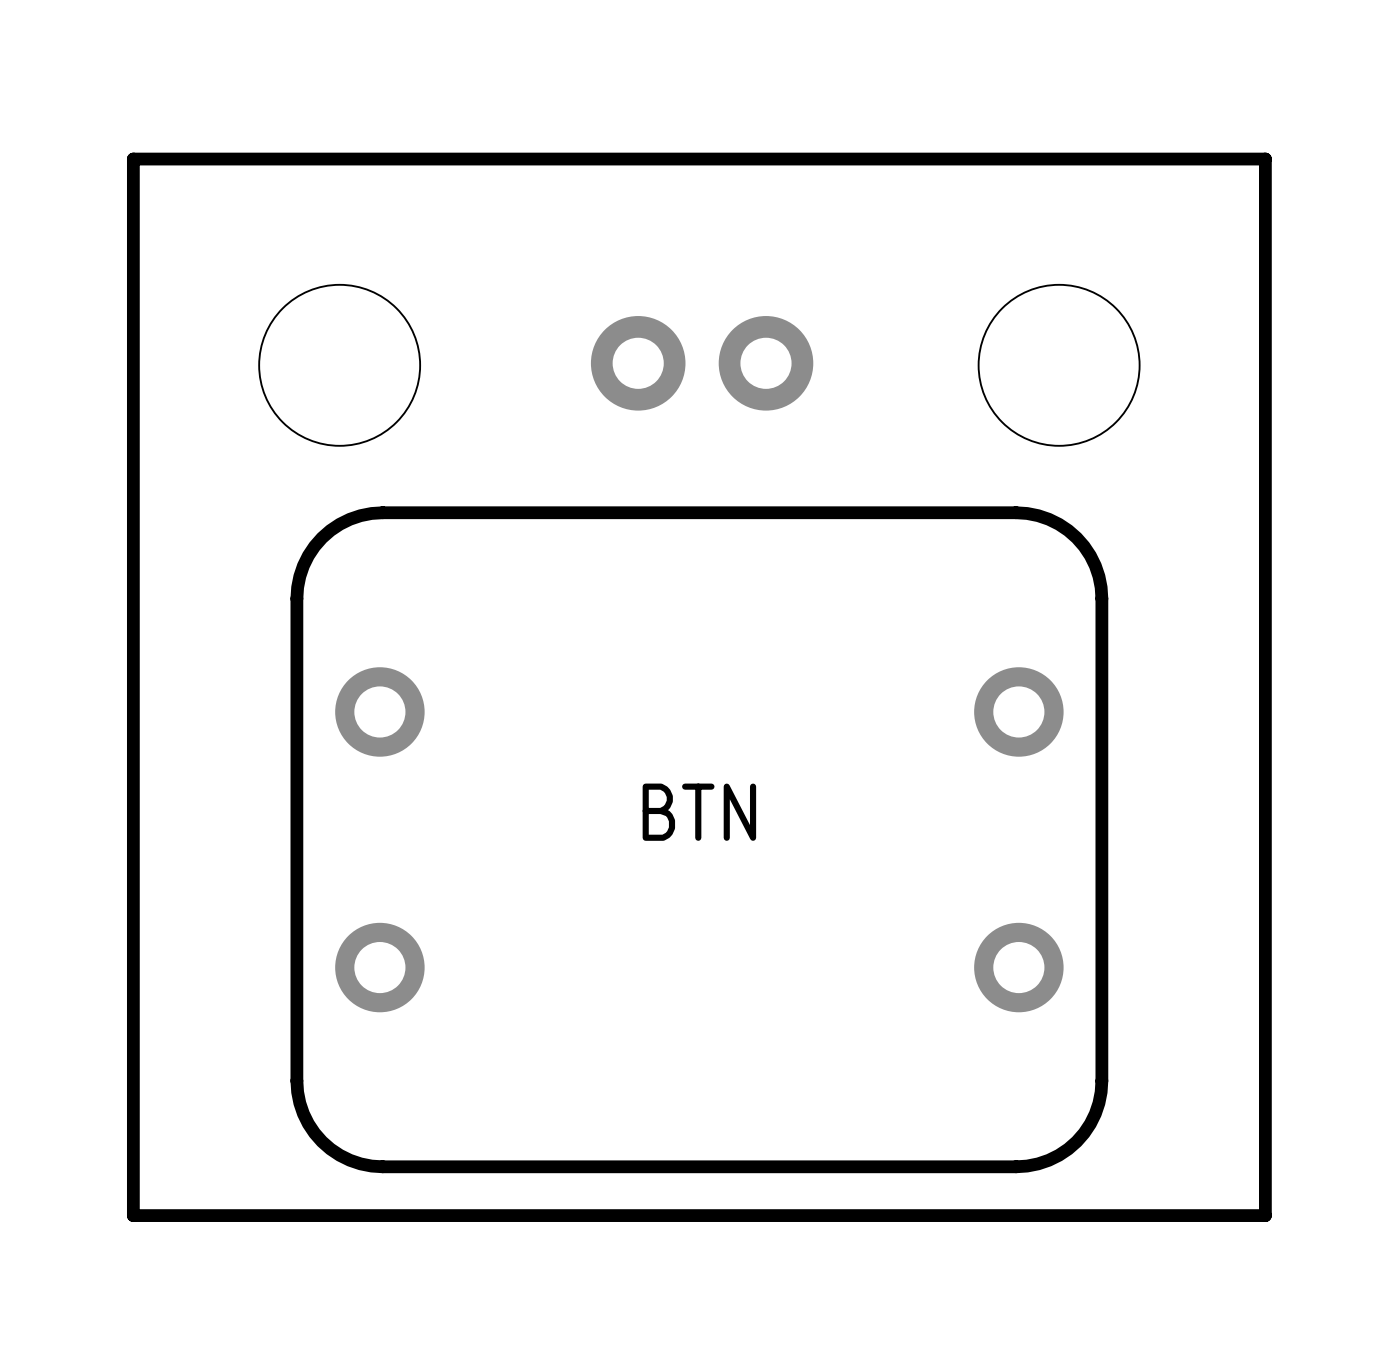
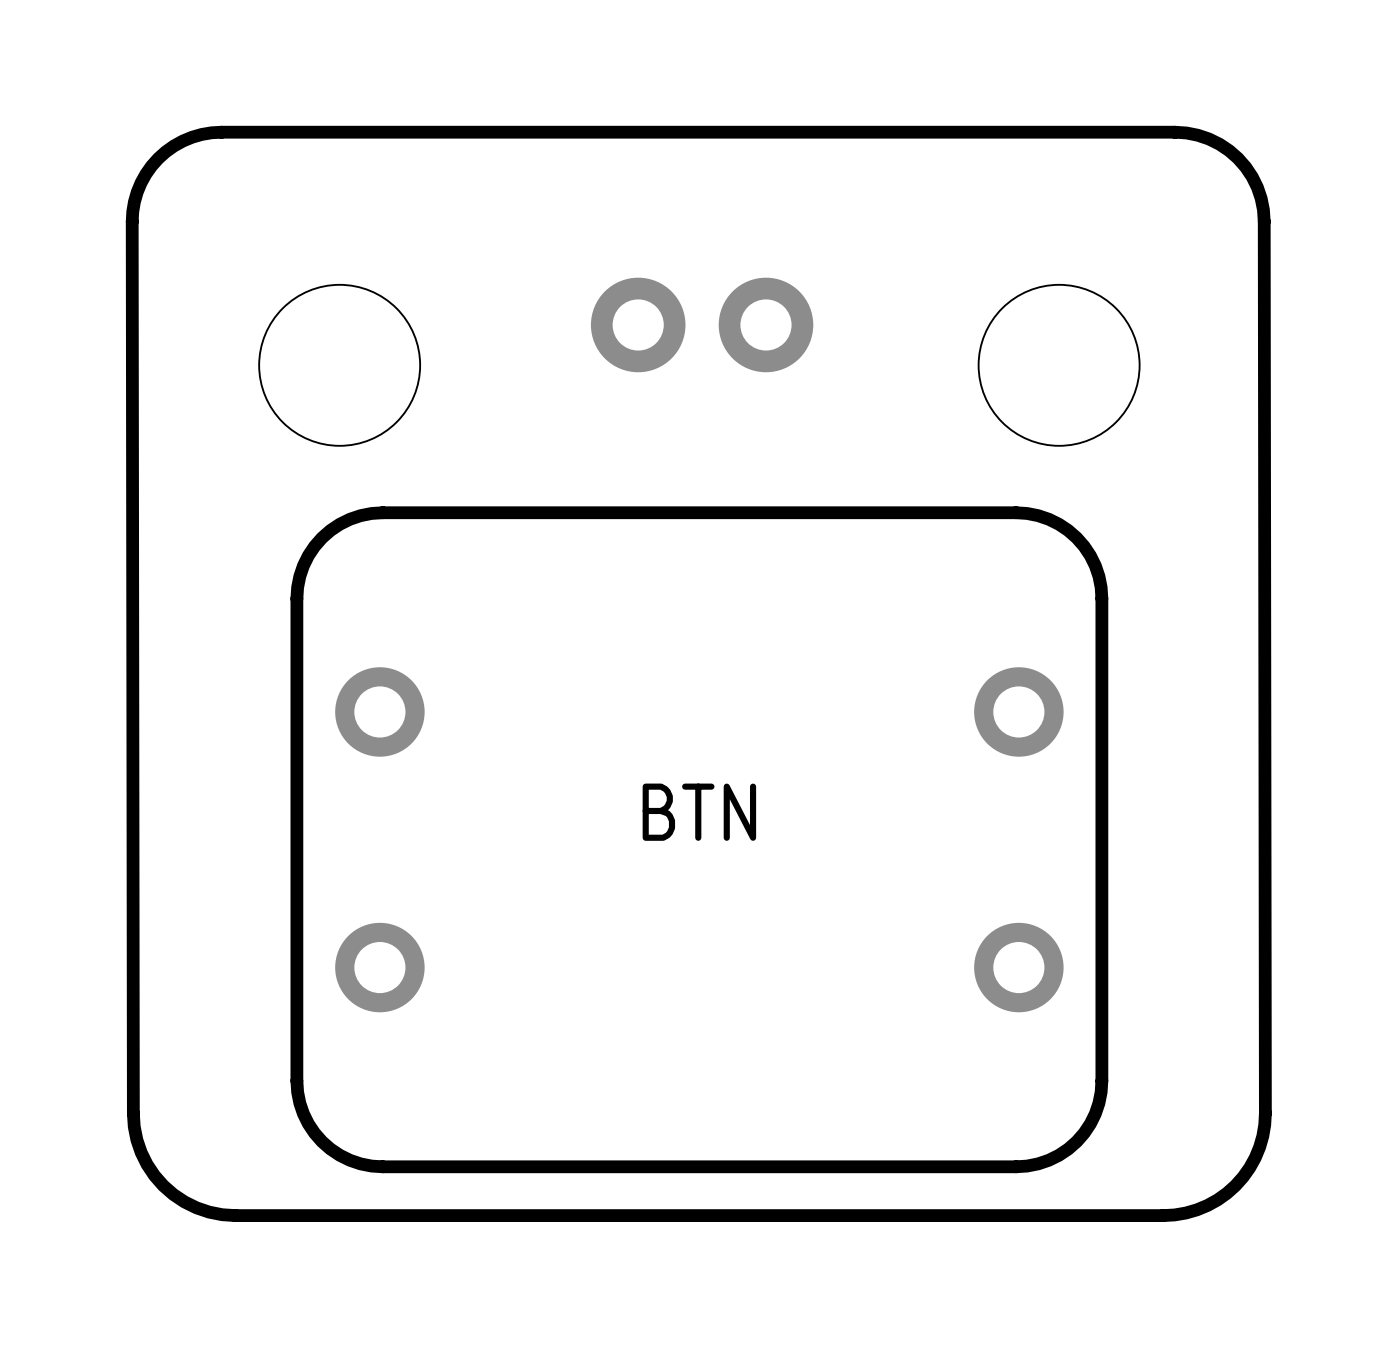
part position: (702, 363) -> (702, 324)
board edge: (235, 1215) (133, 1215) (133, 159) (1265, 159) (1265, 1215) (1163, 1215) -> (235, 1215) (222, 1214) (196, 1207) (184, 1201) (163, 1185) (147, 1164) (141, 1152) (136, 1139) (133, 1113) (132, 211) (141, 182) (151, 165) (165, 151) (192, 137) (221, 132) (1174, 132) (1197, 135) (1219, 144) (1237, 158) (1245, 167) (1257, 187) (1263, 209) (1264, 221) (1264, 1124) (1255, 1157) (1235, 1185) (1217, 1199) (1196, 1209) (1163, 1215)

